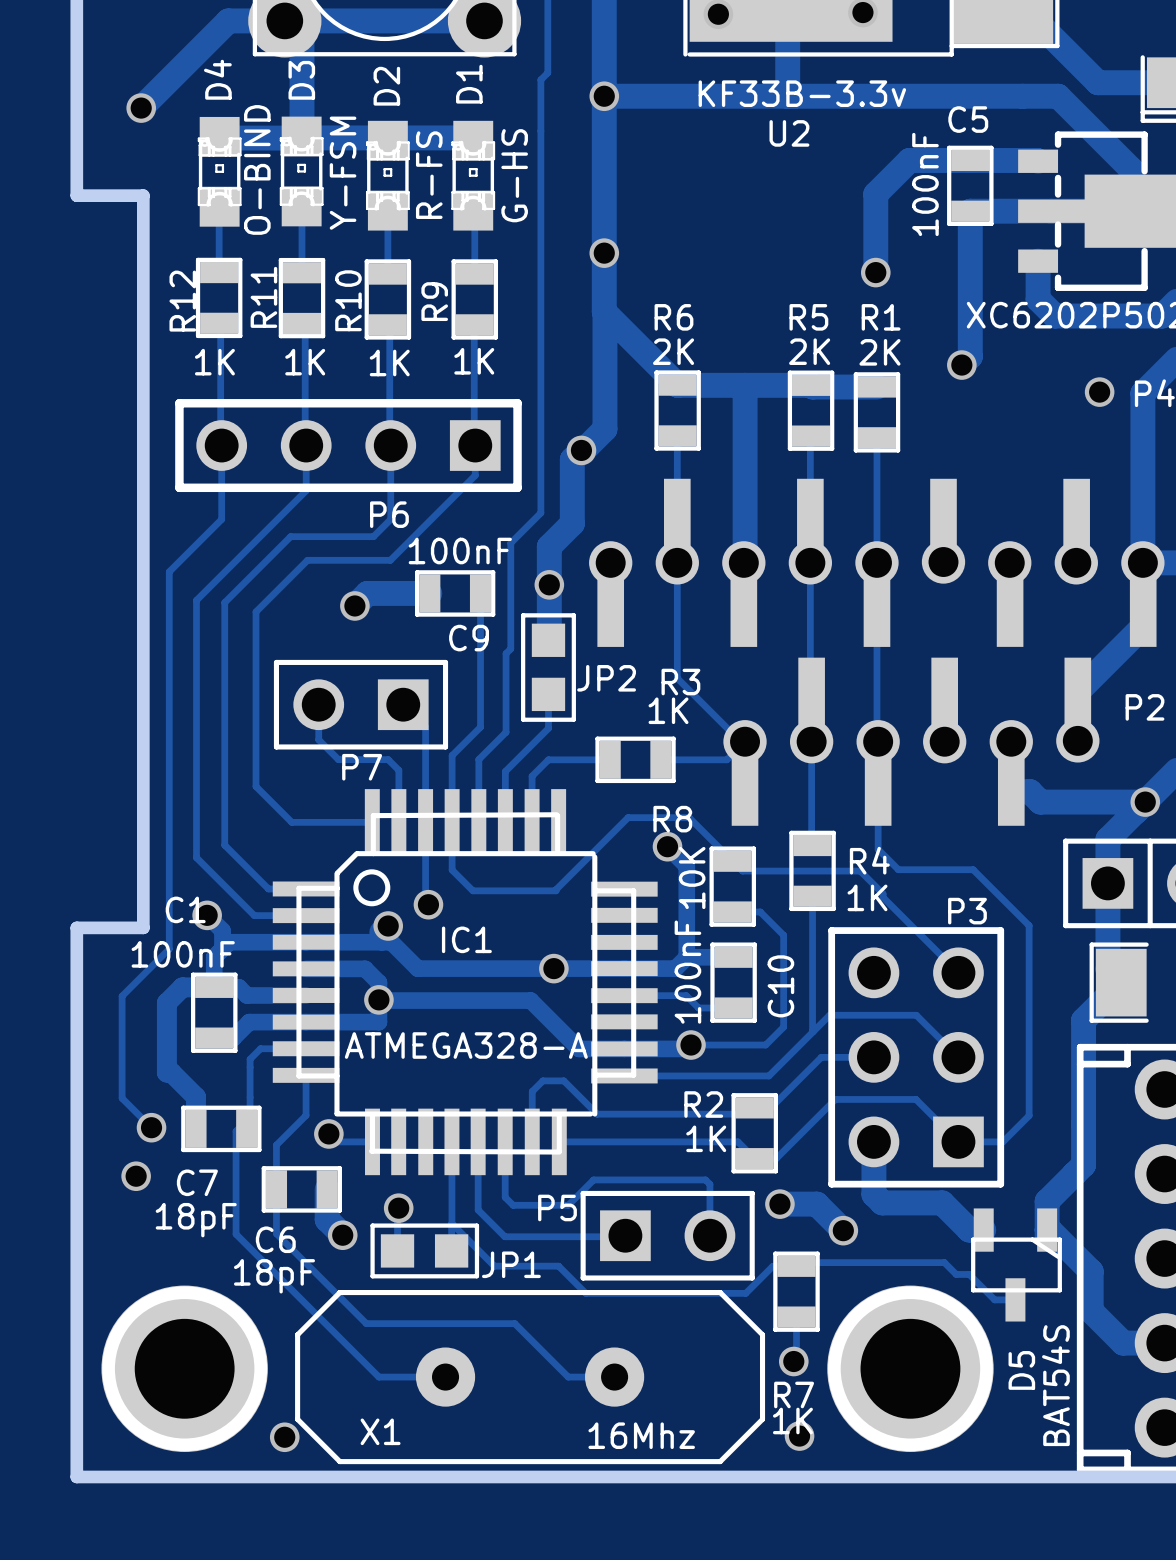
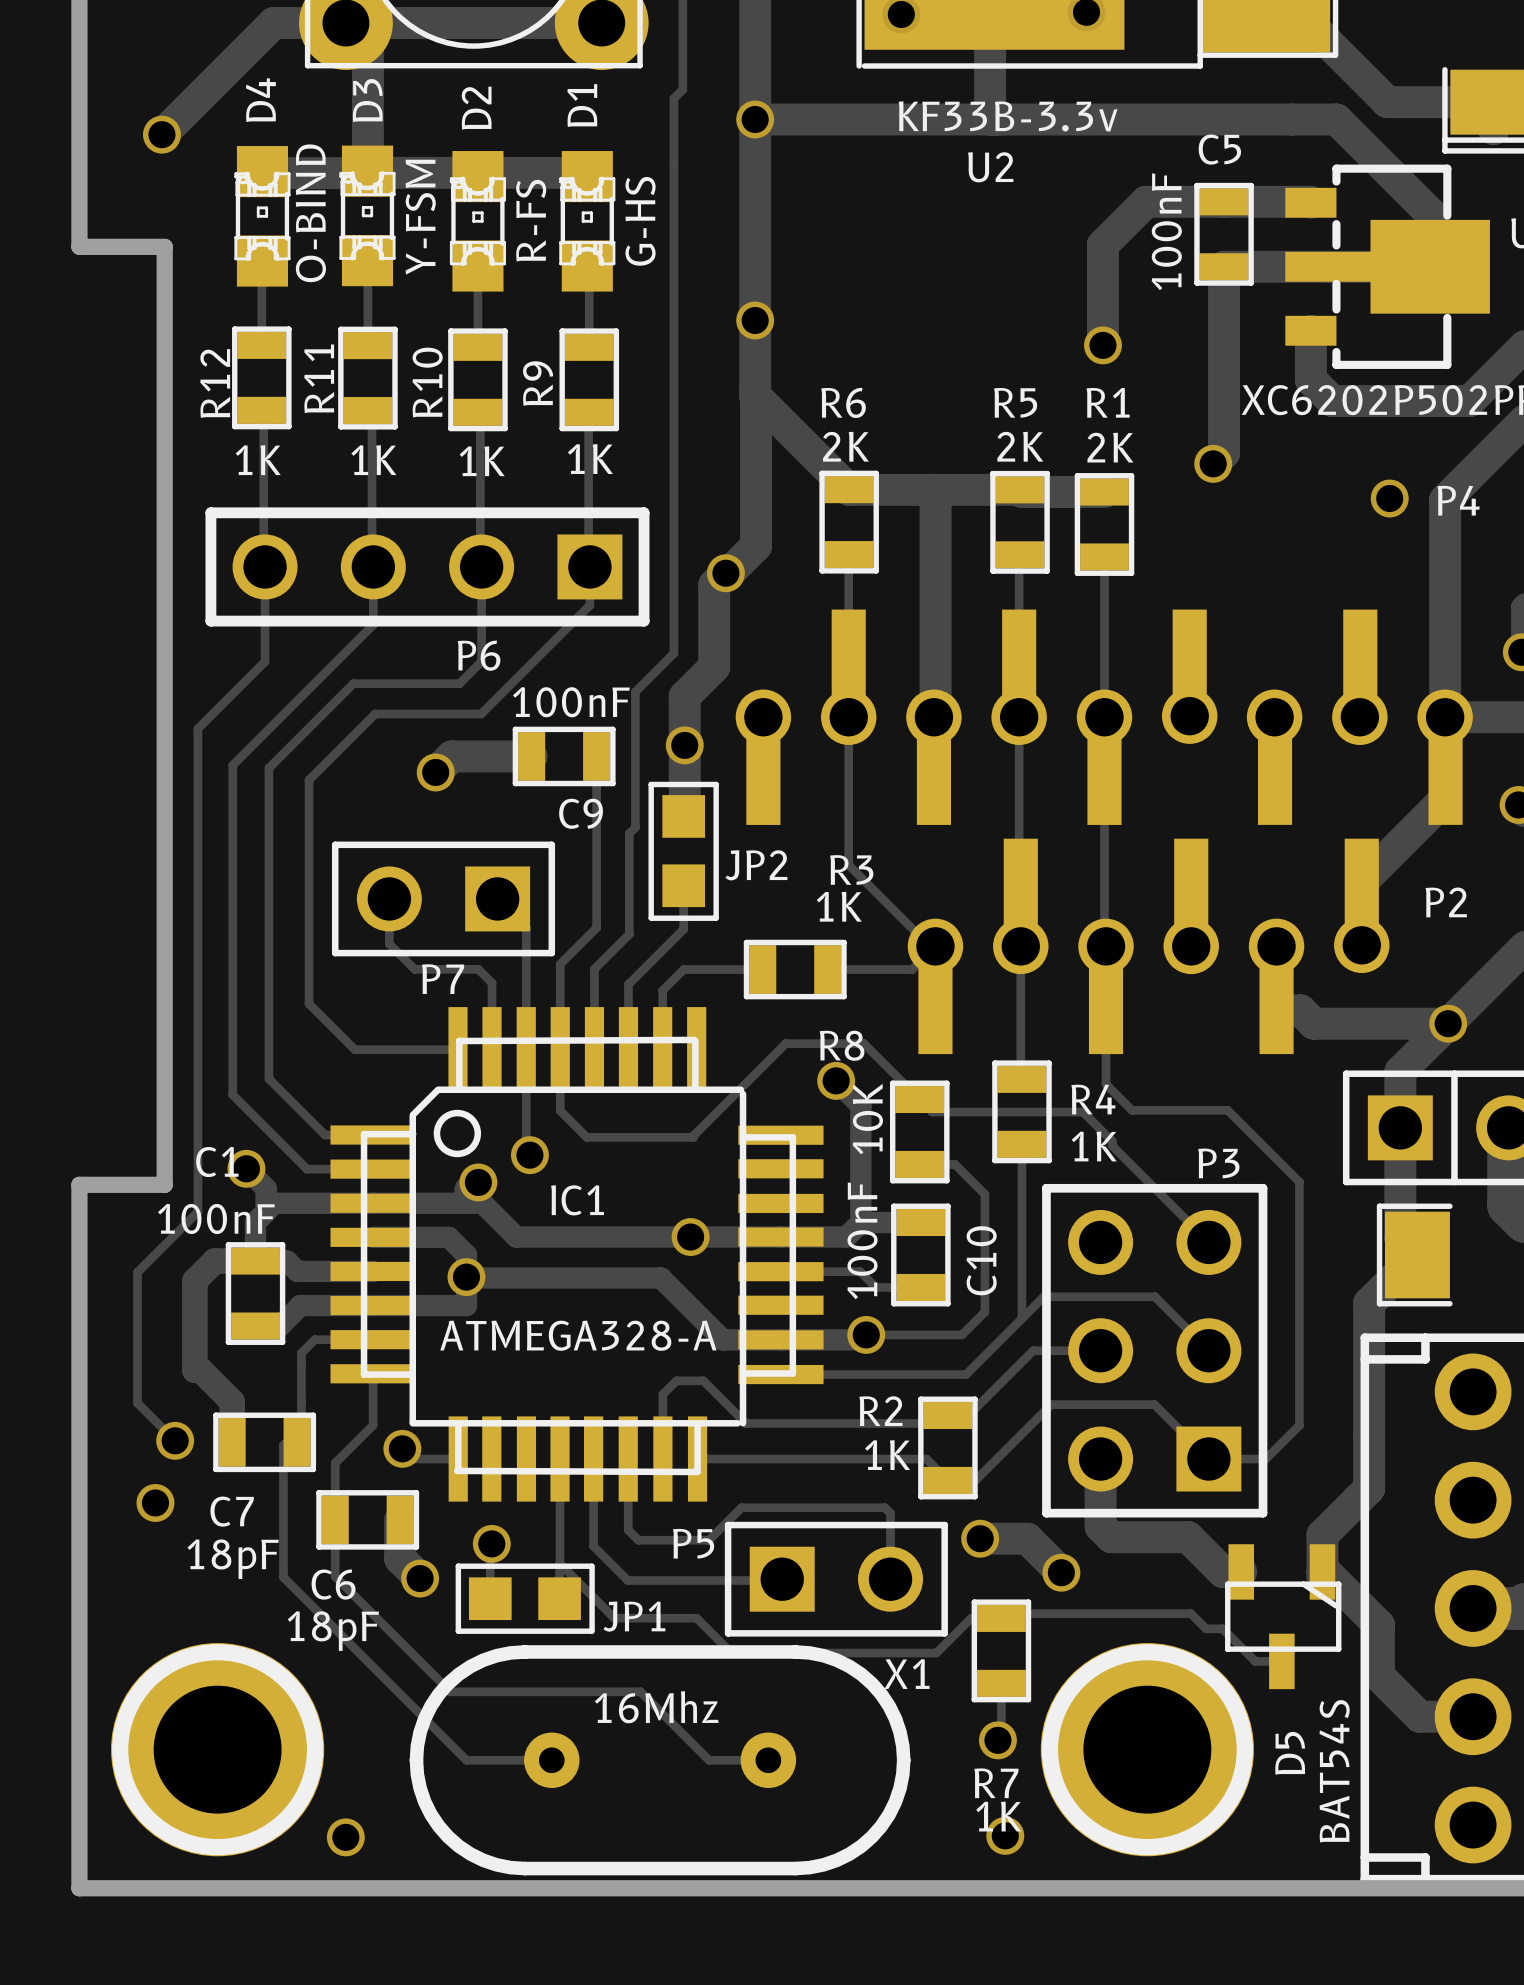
X1 footprint: [295, 1290, 766, 1465] -> [409, 1645, 911, 1876]
X1 name position: X1 (380, 1431) -> X1 (906, 1674)
X1 value position: 16Mhz (641, 1435) -> 16Mhz (656, 1707)

